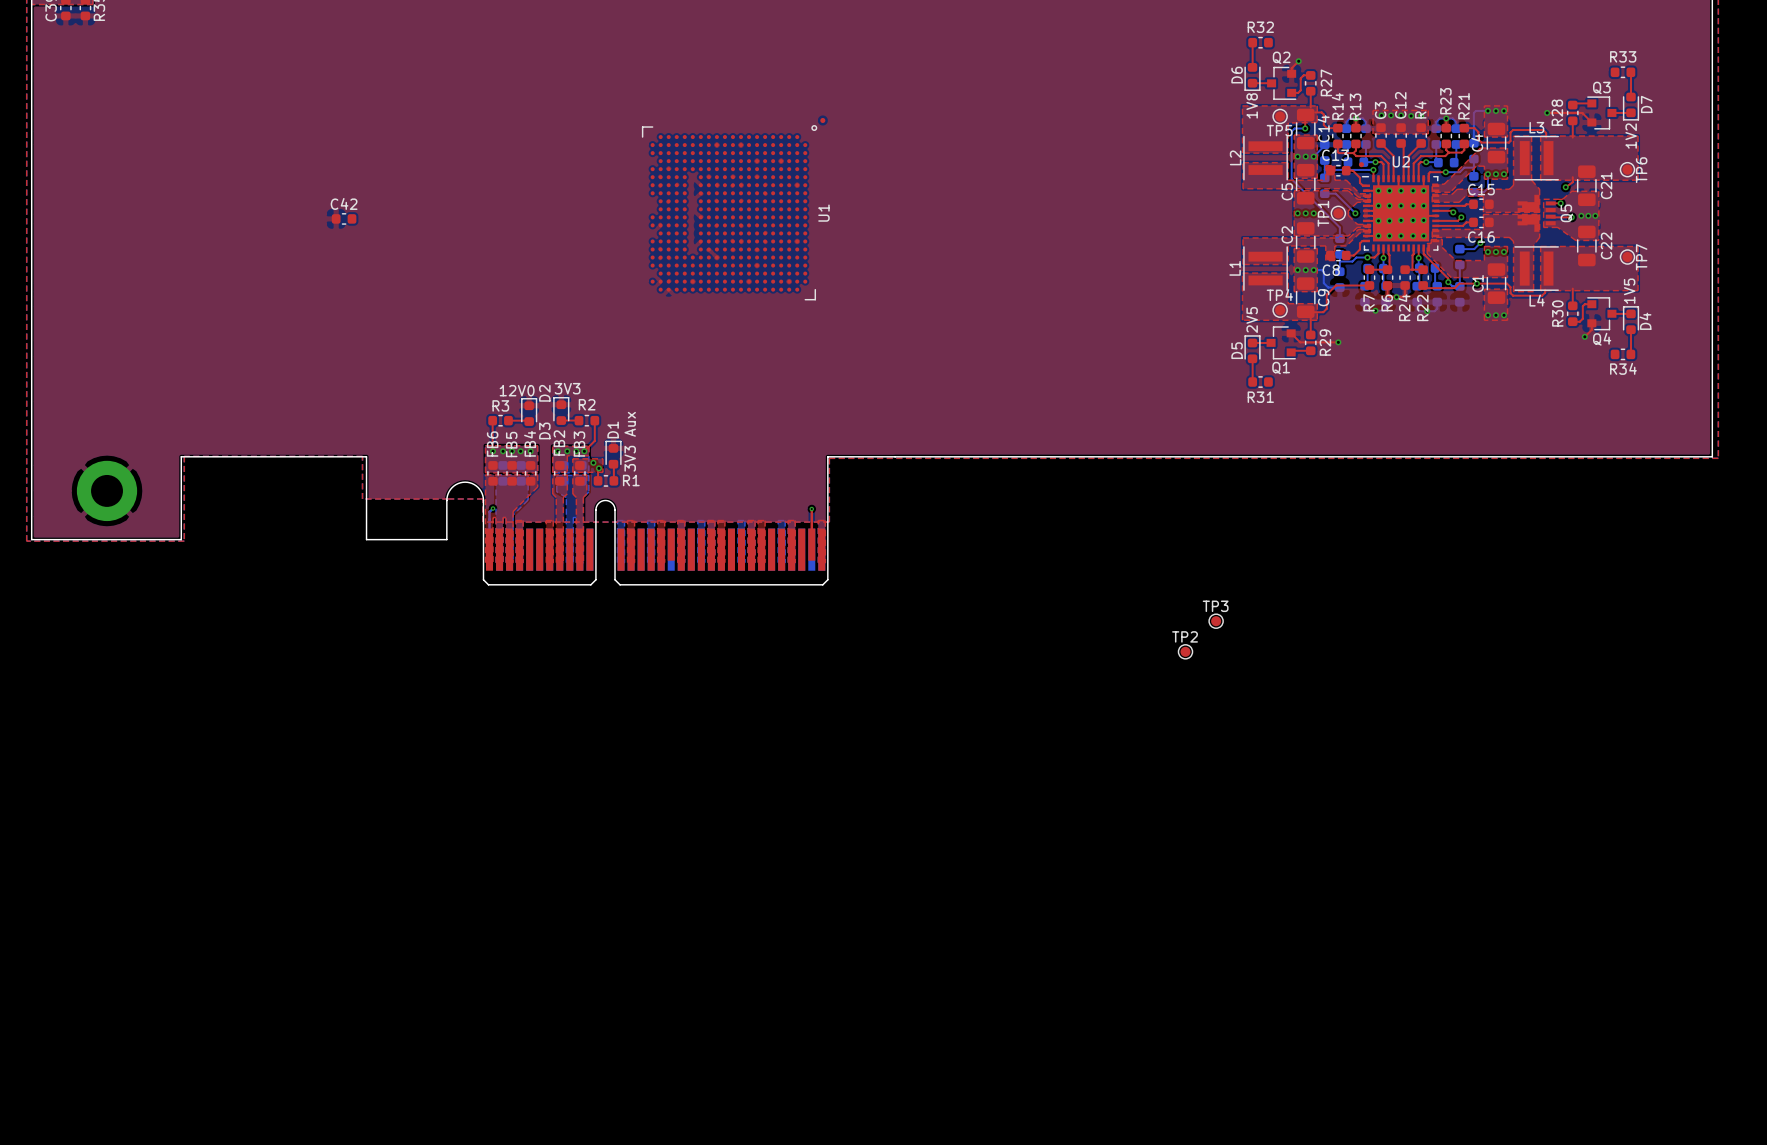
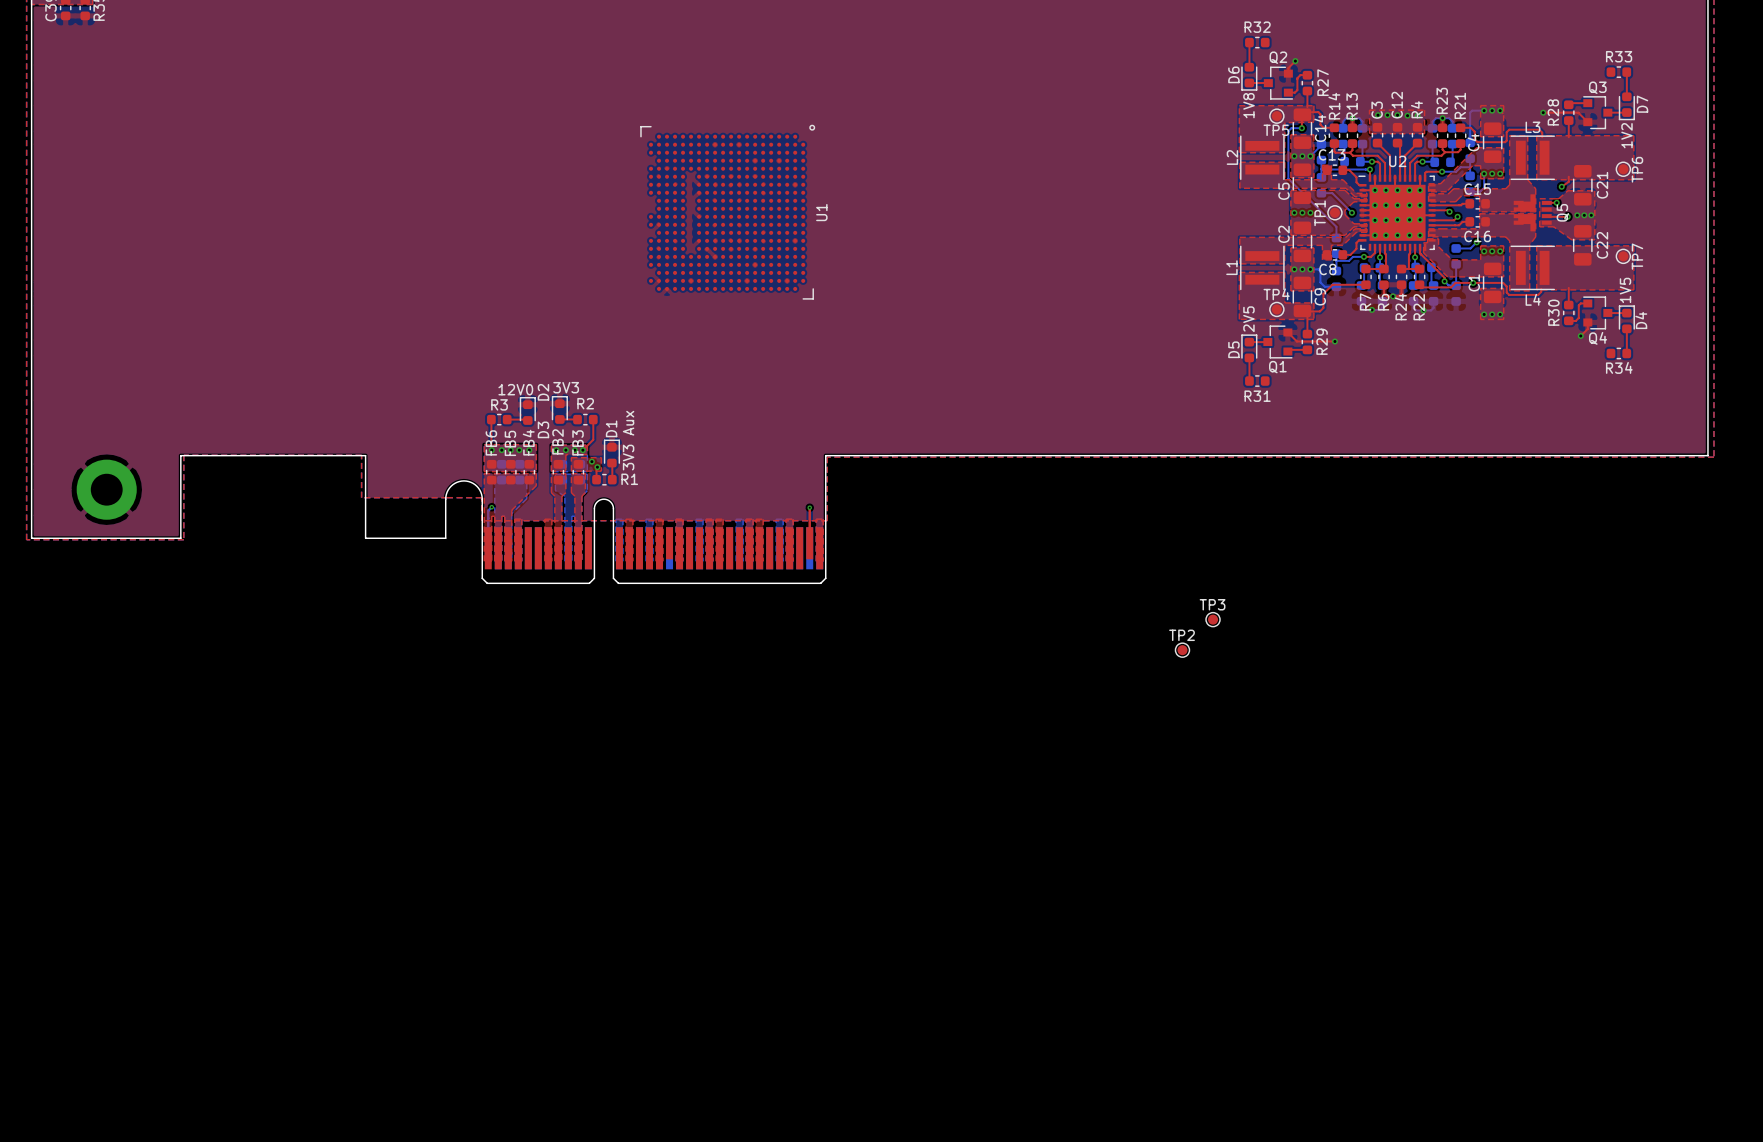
part: (822, 120) -> none
part: (1361, 164) -> none
C42: (344, 218) -> none

